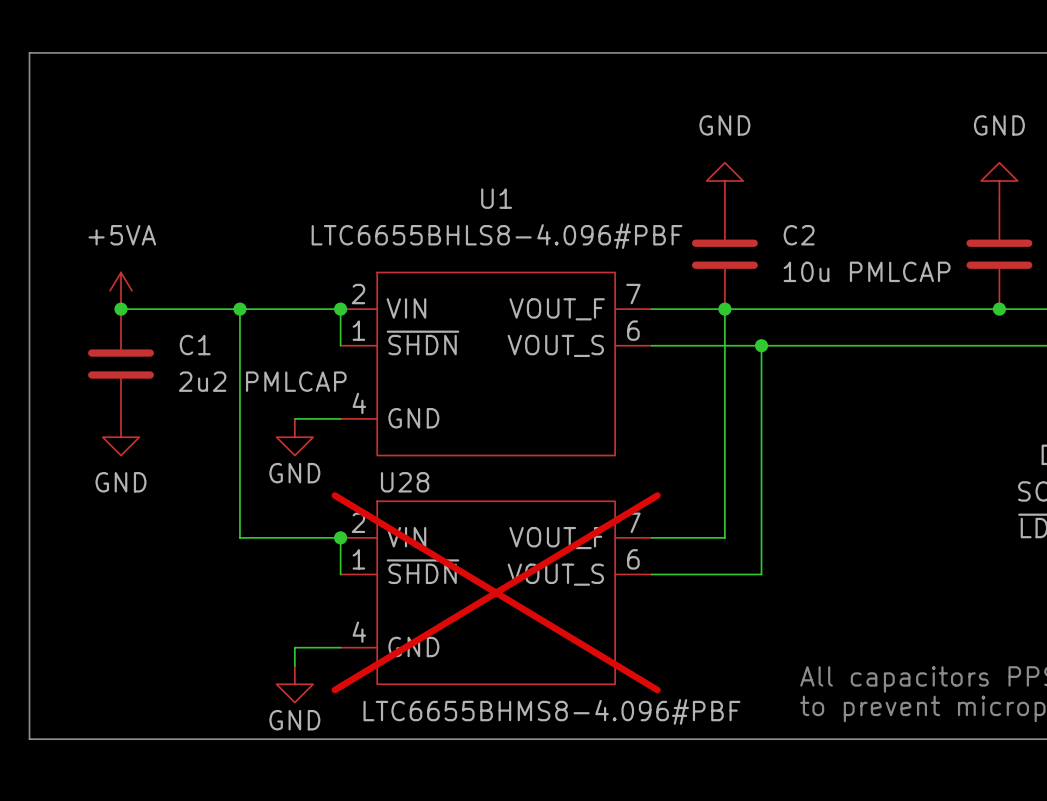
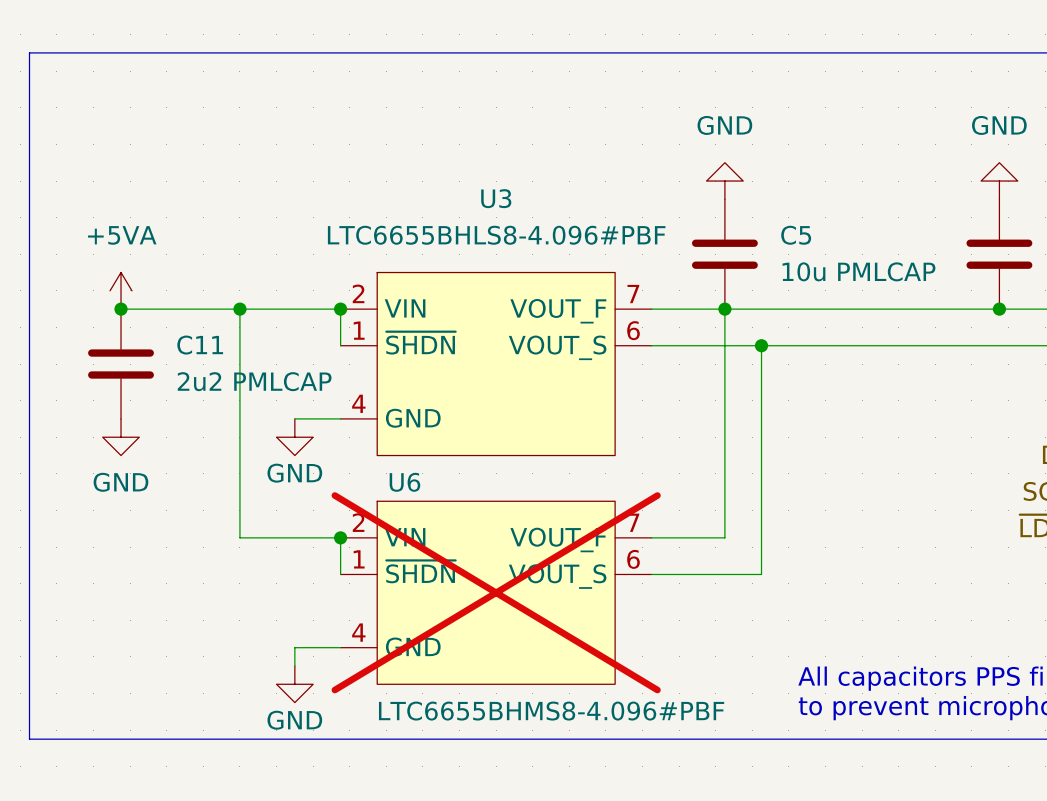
U1 name: U1 (496, 198) -> U3 (496, 198)
C2 name: C2 (799, 235) -> C5 (796, 235)
C1 name: C1 (195, 345) -> C11 (200, 345)
U28 name: U28 (405, 482) -> U6 (404, 482)

